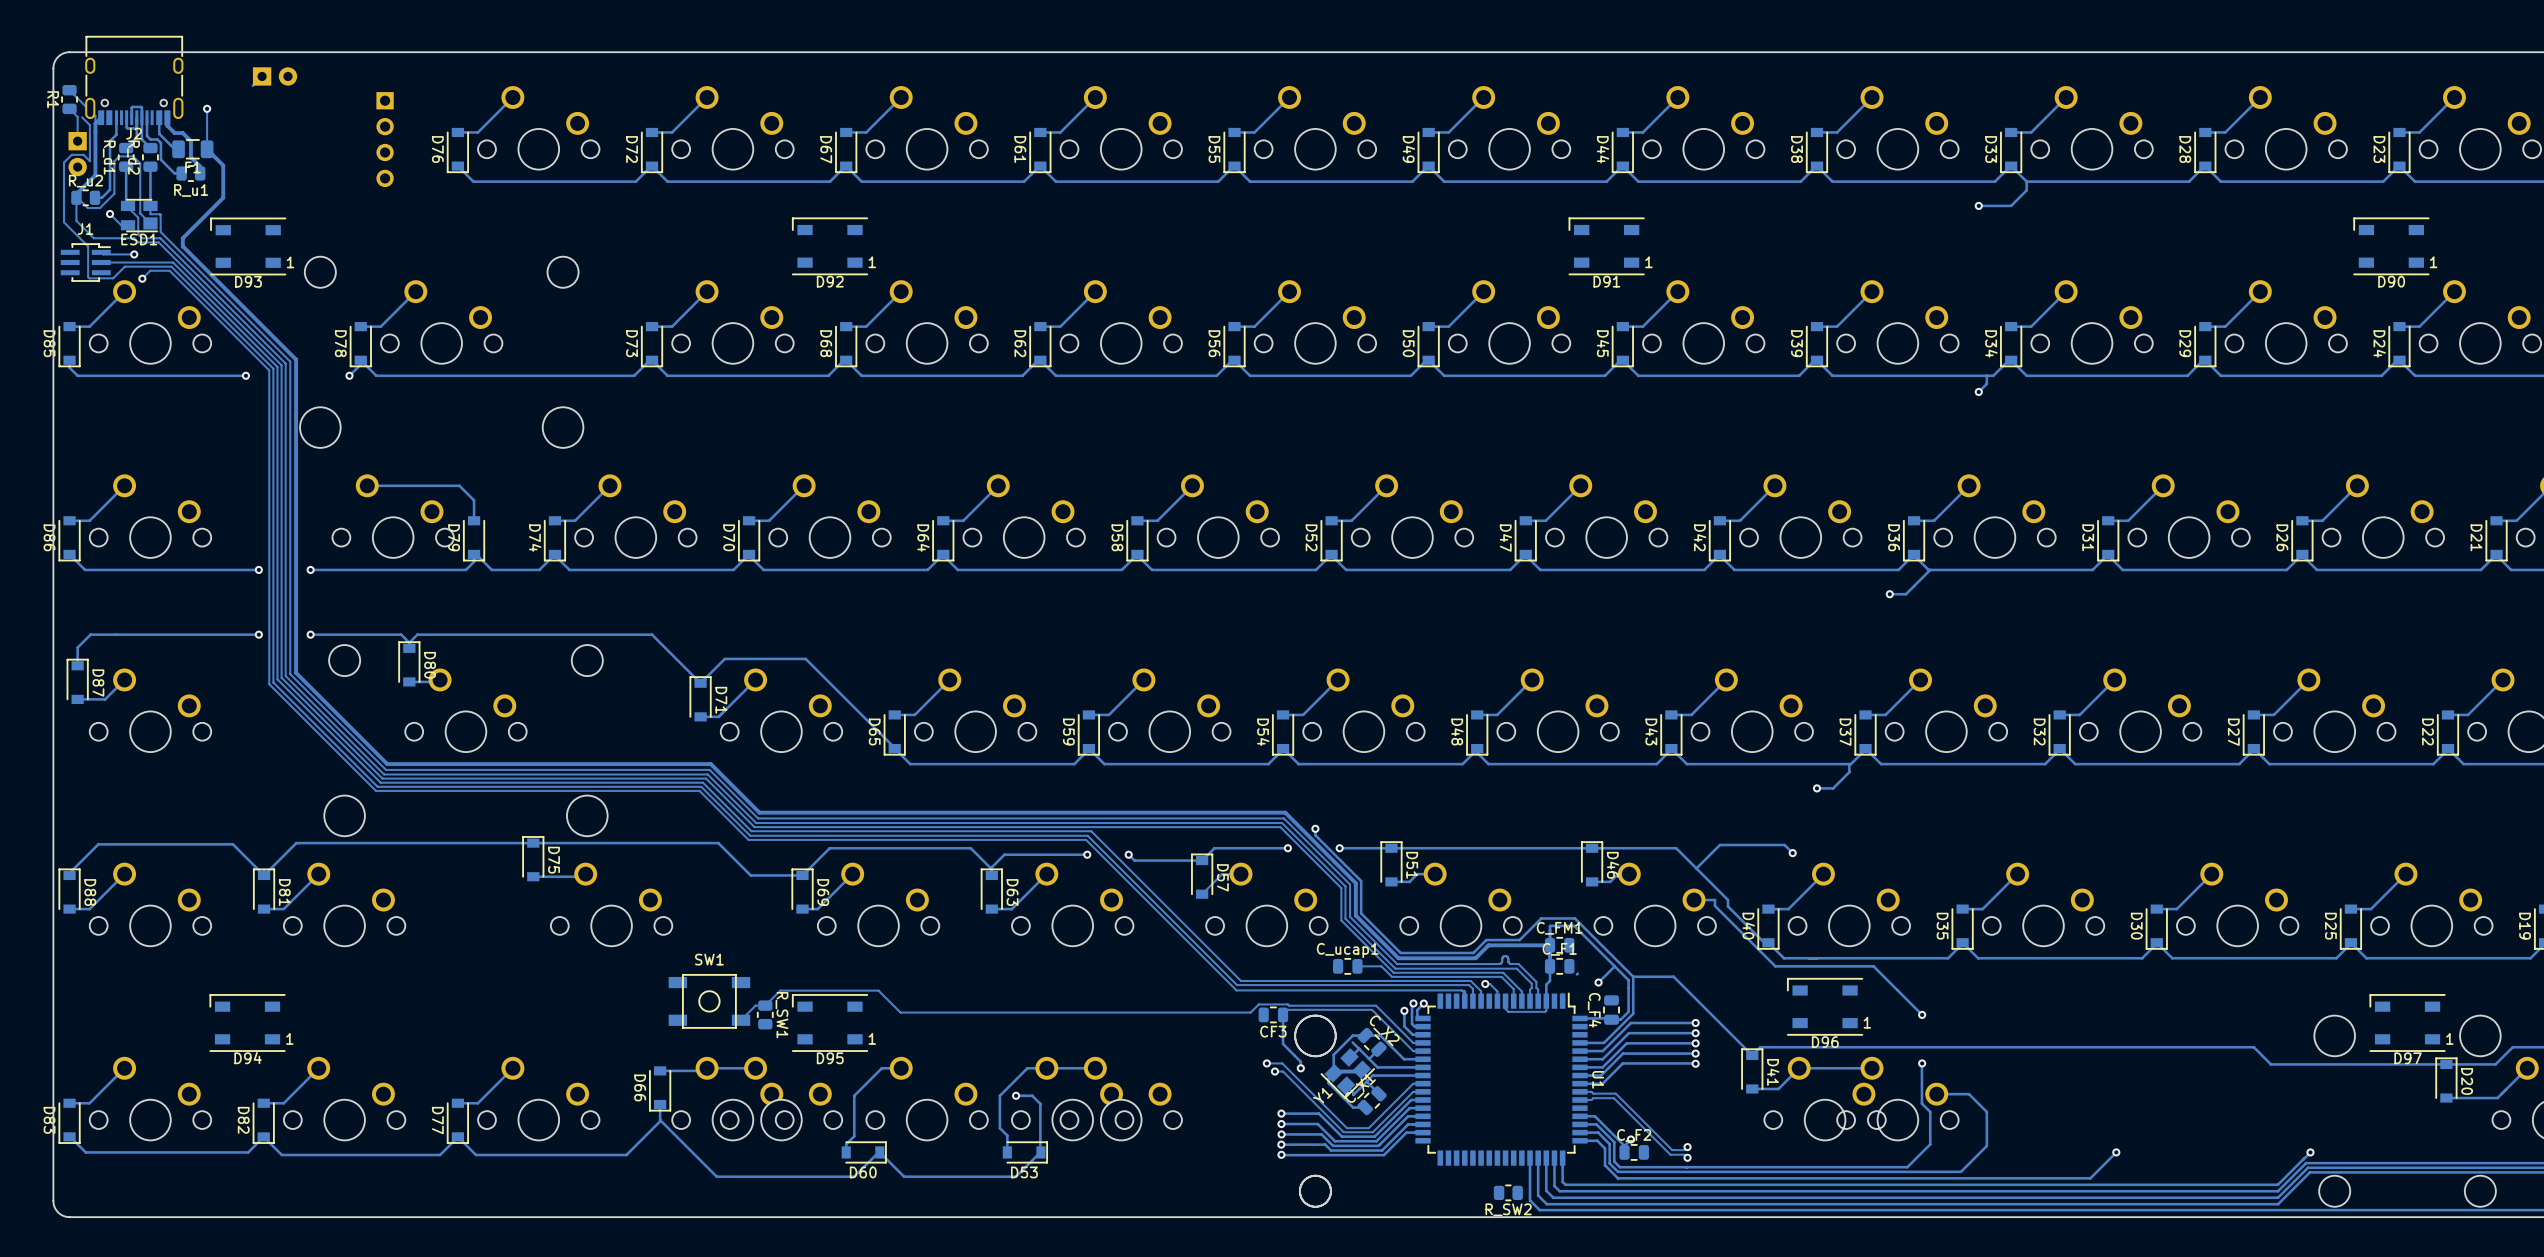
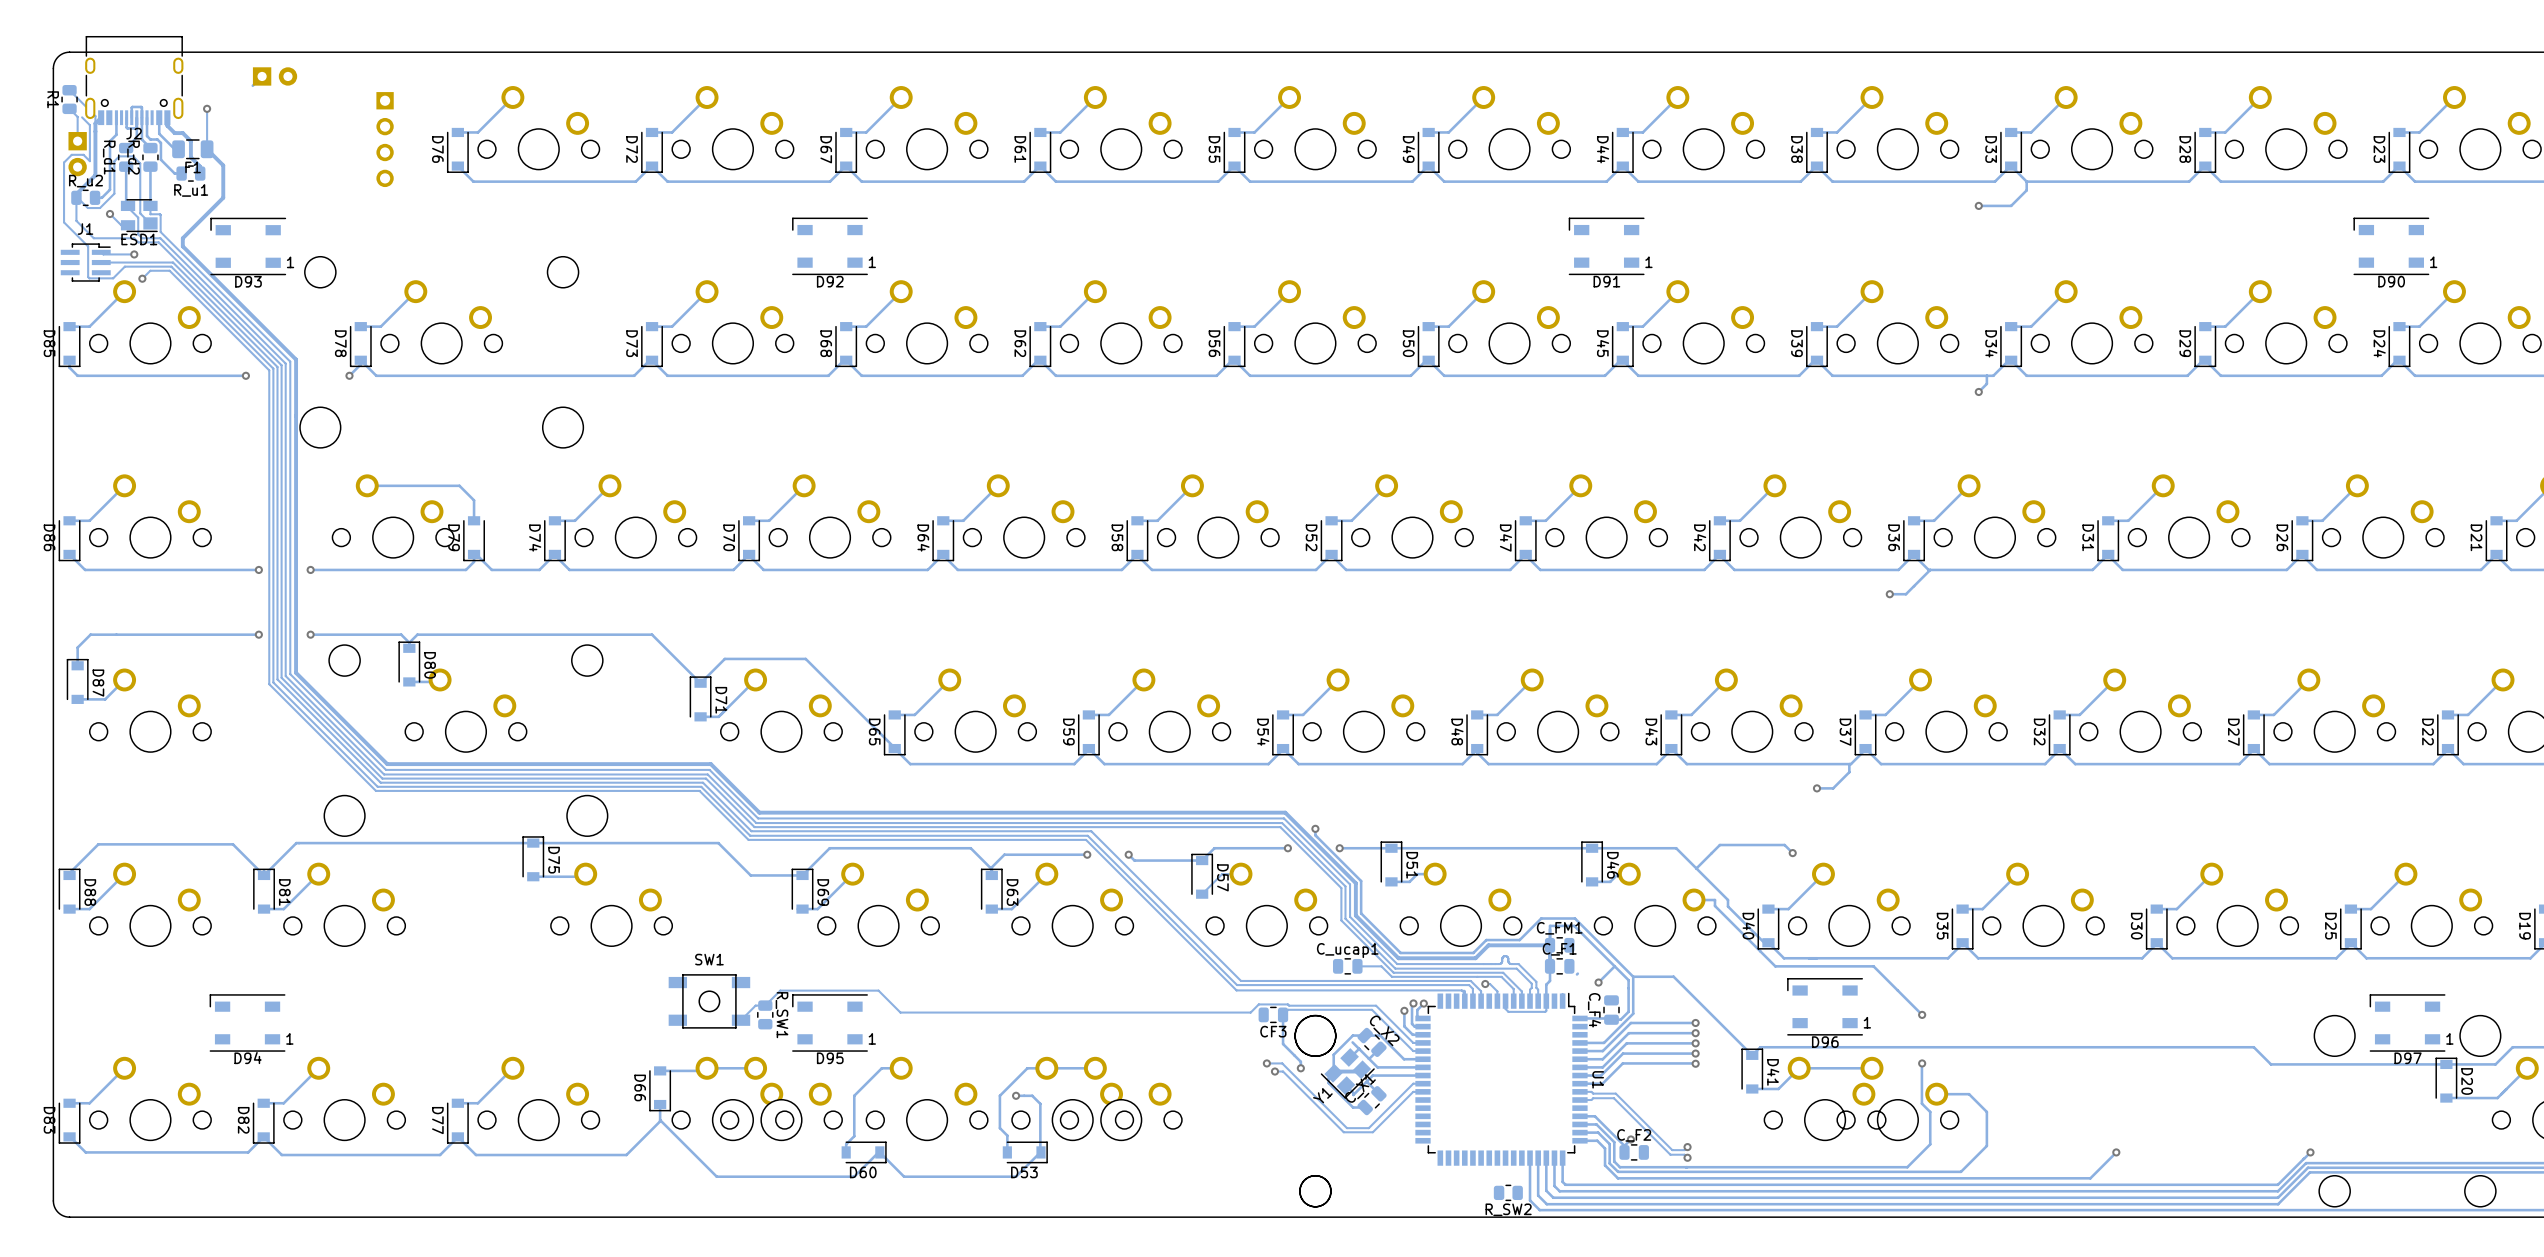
track: (1423, 1100) (1411, 1100) (1374, 1136) (1341, 1136) (1318, 1113) (1281, 1113) -> none
track: (1423, 1108) (1409, 1108) (1376, 1141) (1334, 1141) (1317, 1124) (1281, 1124) -> none
via: (1281, 1113) -> none
track: (1423, 1116) (1408, 1116) (1378, 1145) (1333, 1145) (1321, 1134) (1281, 1134) -> none
via: (1281, 1124) -> none
track: (1423, 1124) (1408, 1124) (1382, 1150) (1331, 1150) (1325, 1144) (1281, 1144) -> none
track: (1423, 1132) (1406, 1132) (1383, 1155) (1281, 1154) -> none
via: (1281, 1134) -> none
via: (1281, 1144) -> none
via: (1281, 1154) -> none

